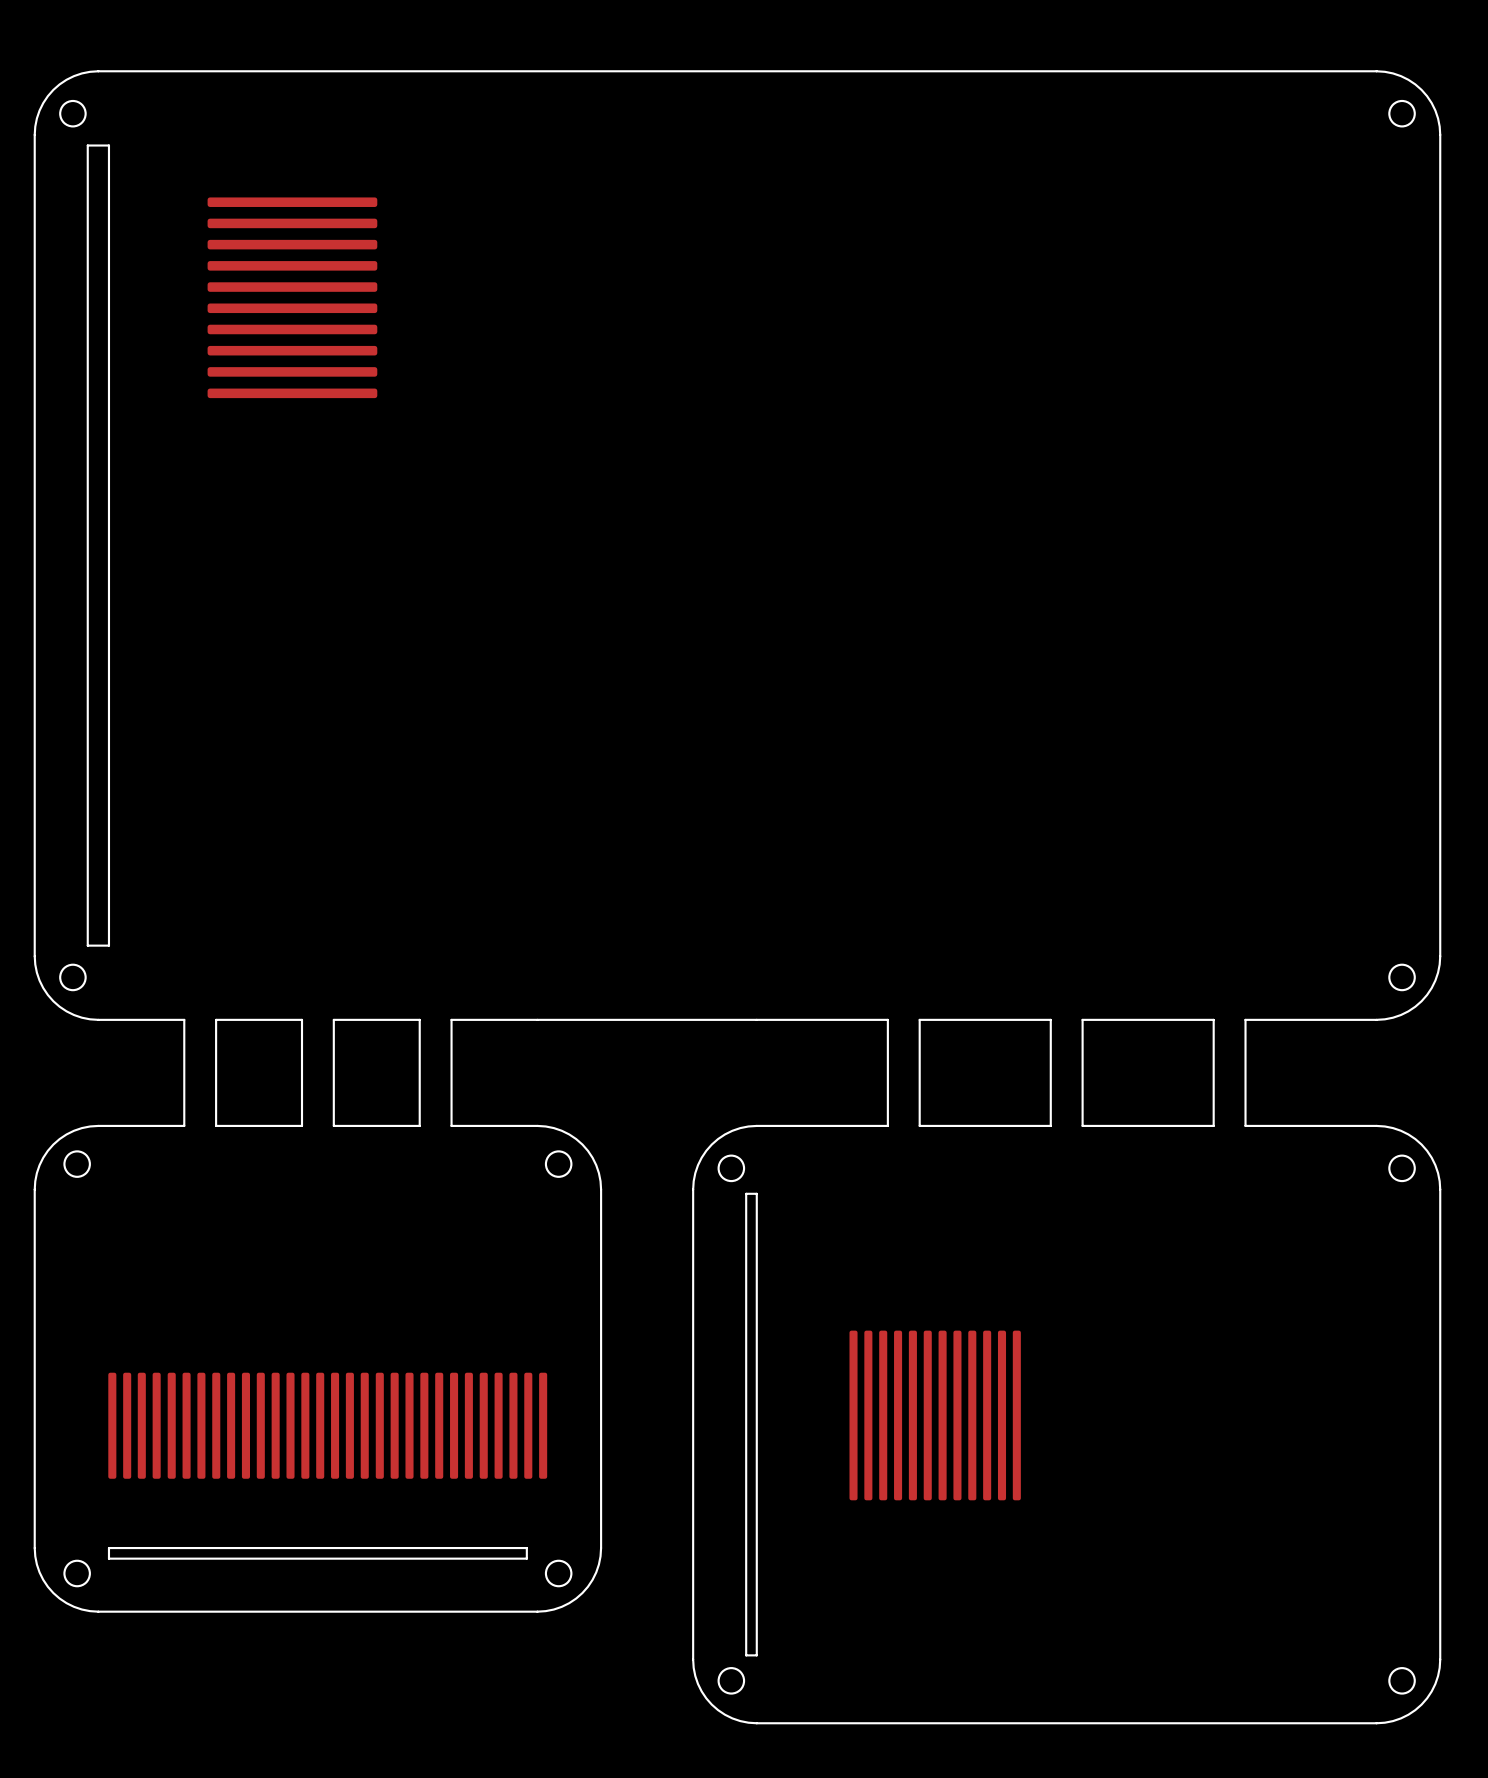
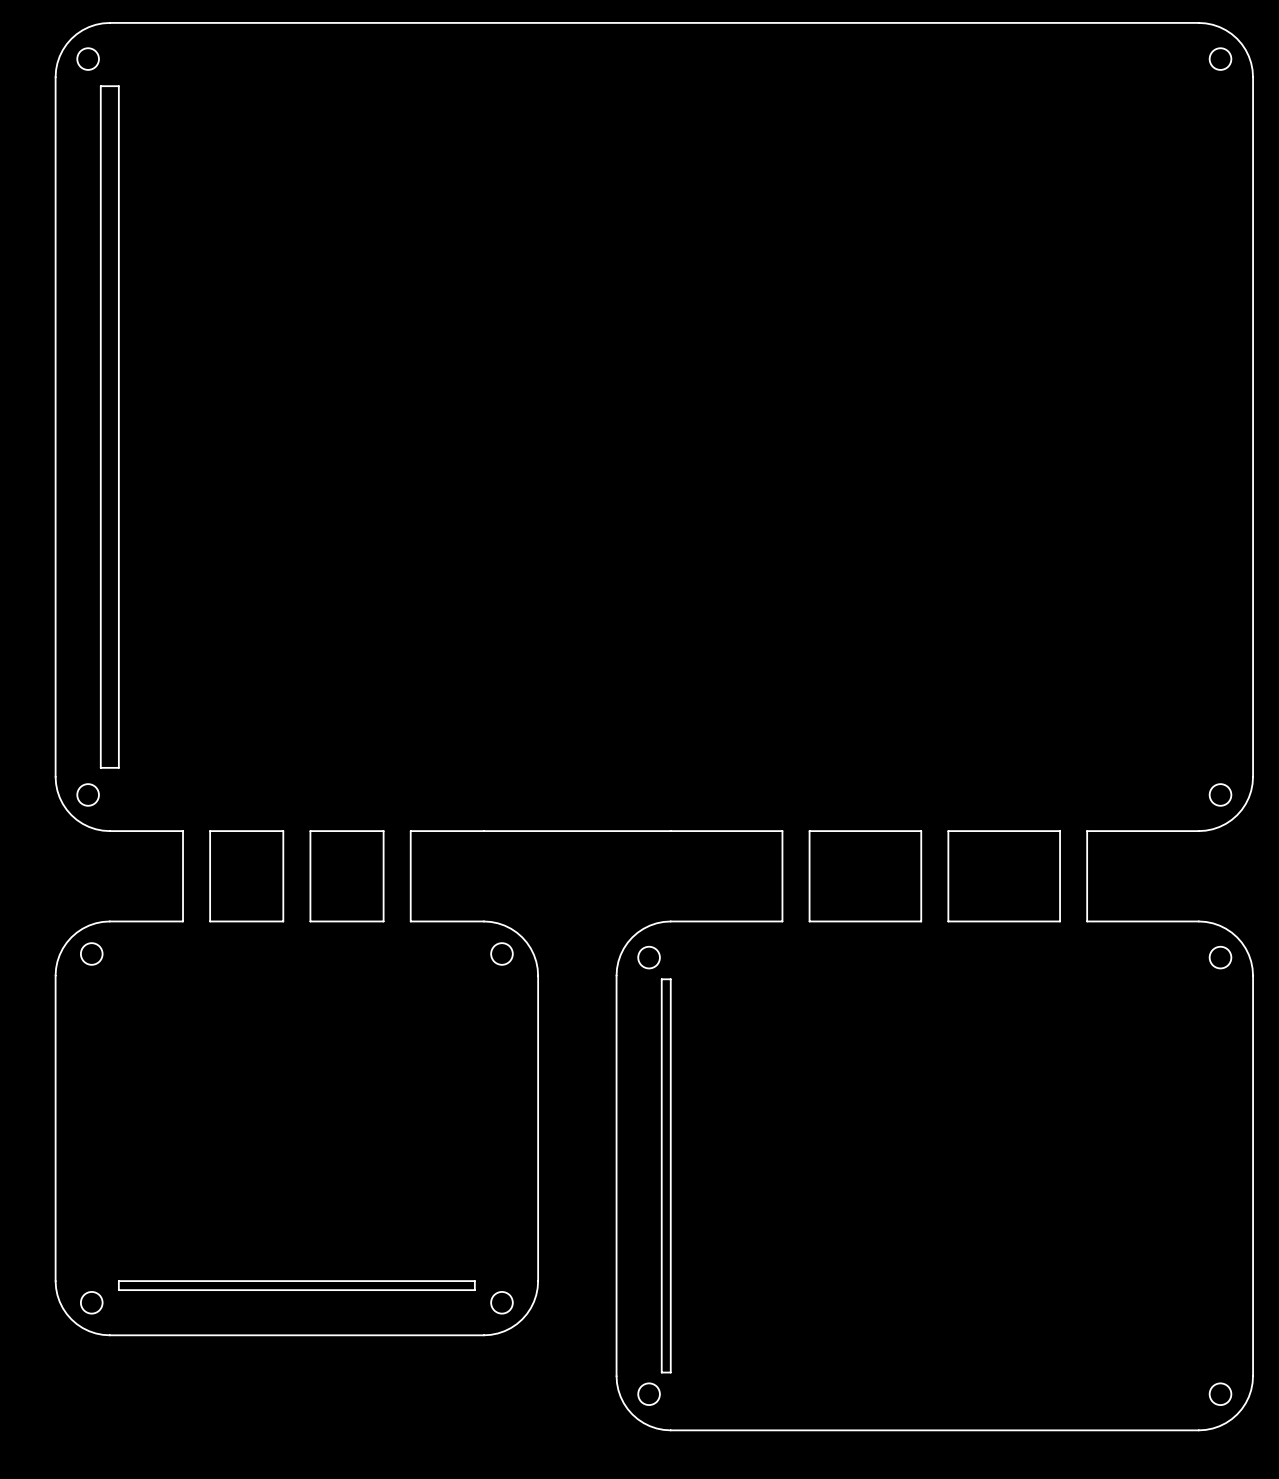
part: (292, 297) -> none
part: (935, 1415) -> none
part: (327, 1425) -> none

